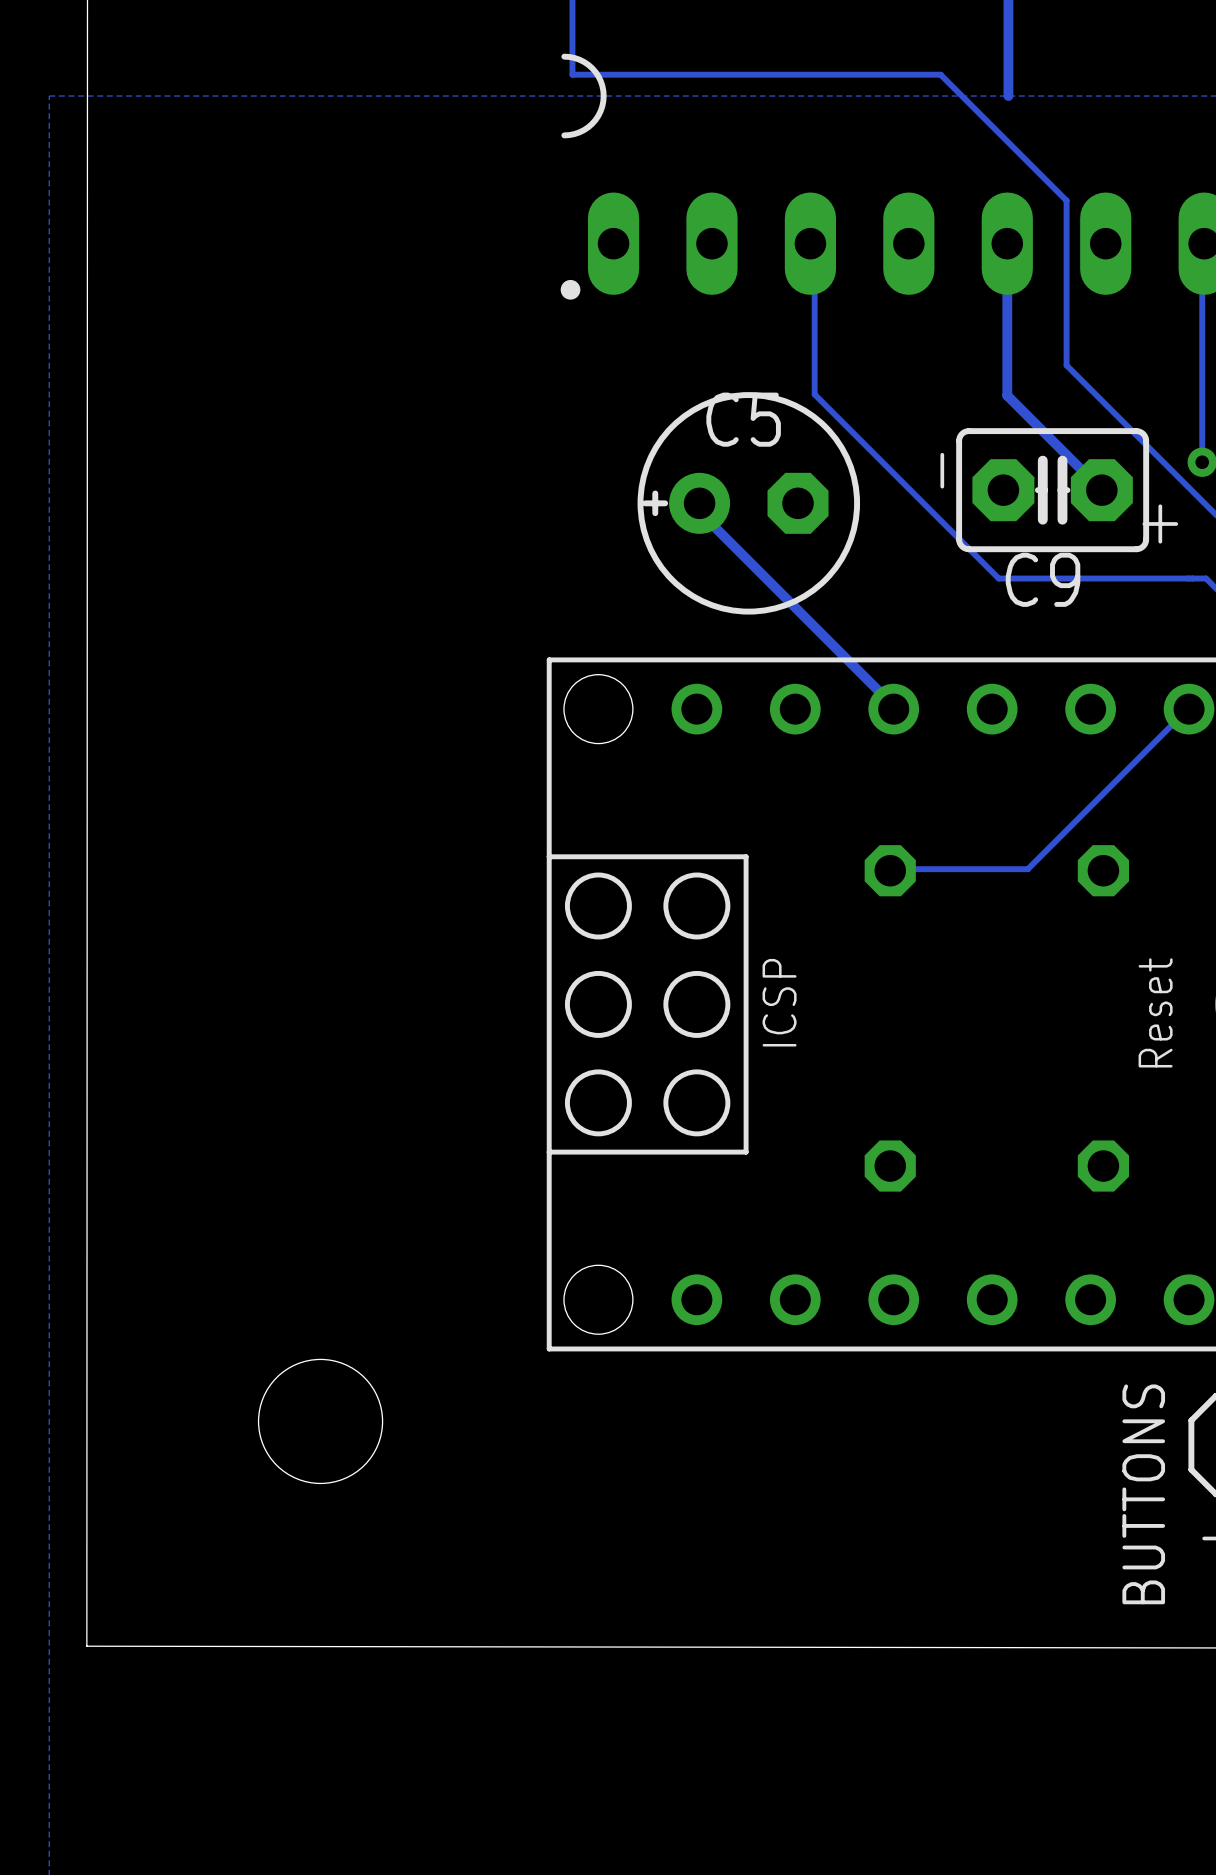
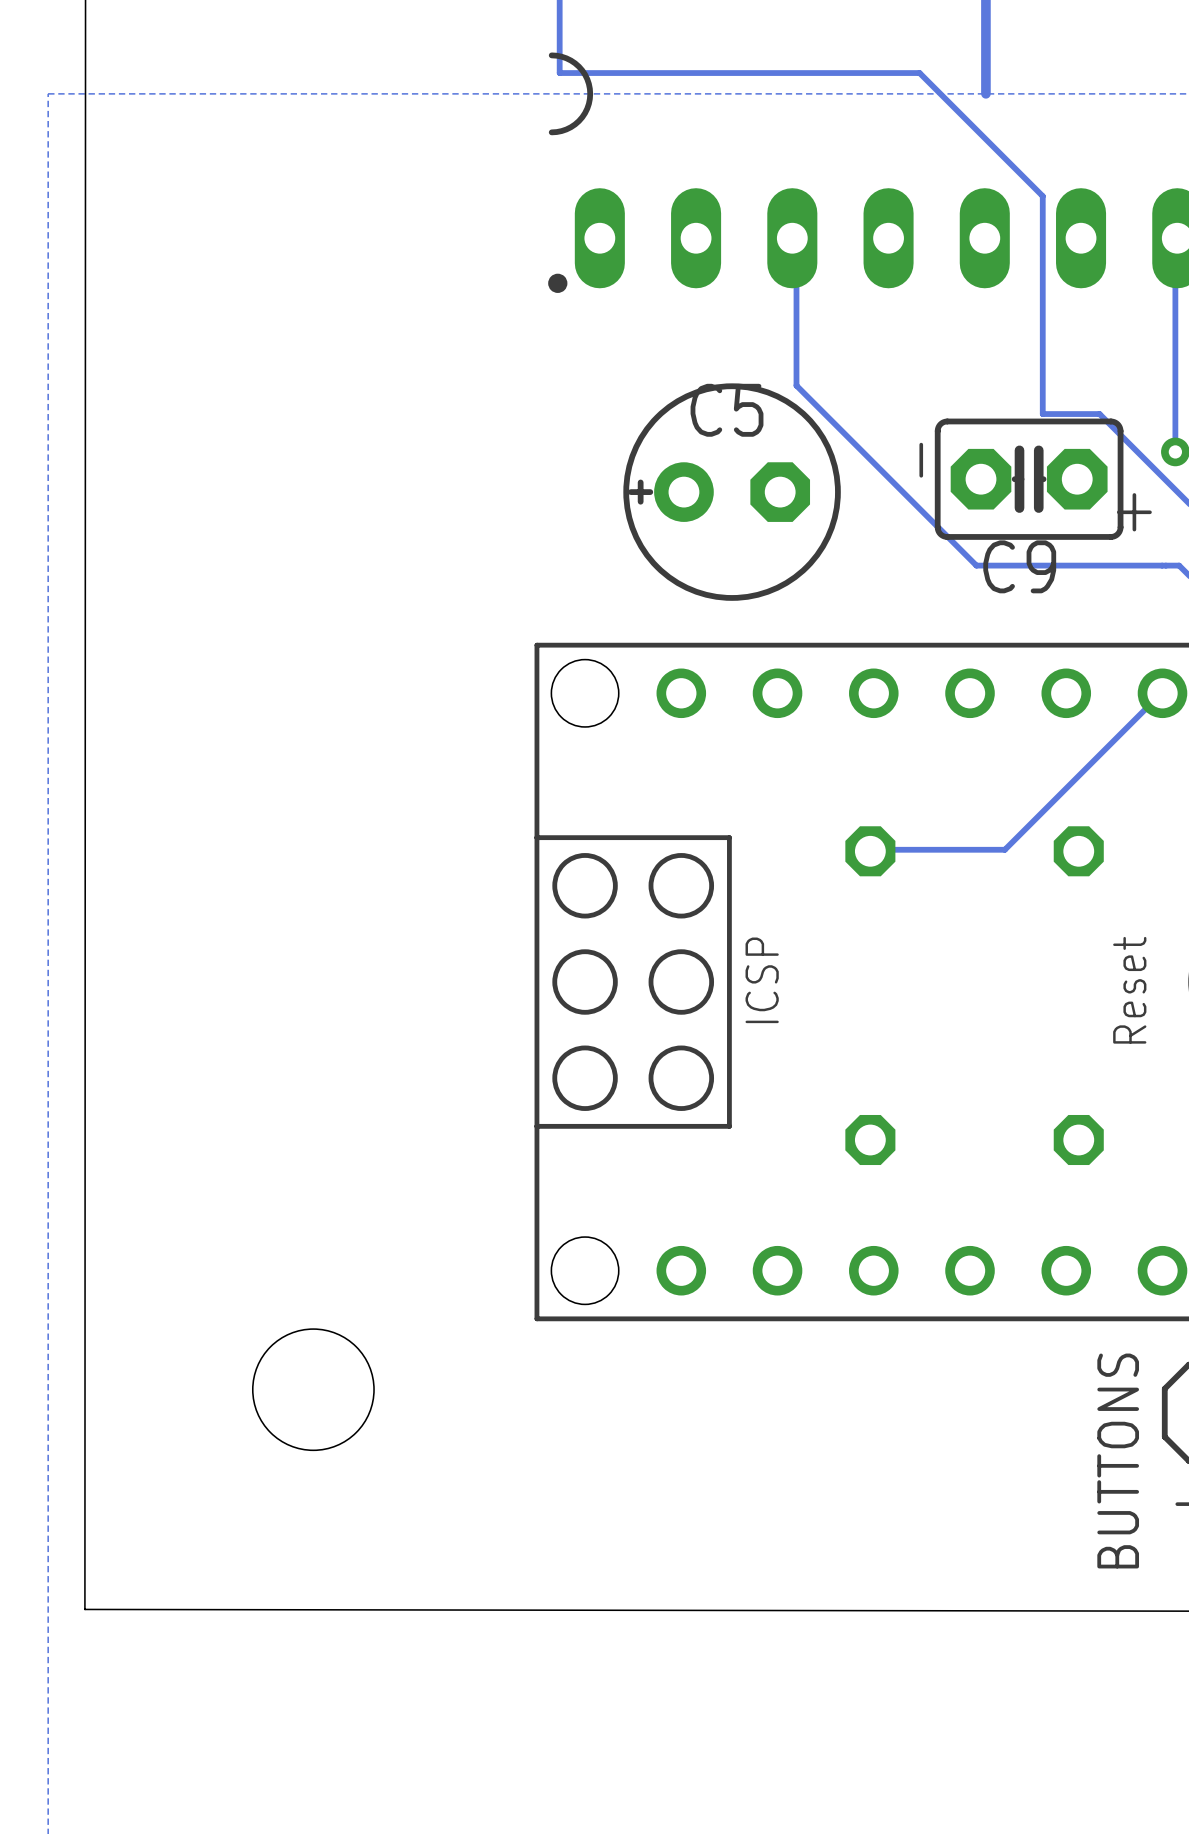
track: (1007, 243) (1007, 395) (1101, 490) -> none
track: (1066, 365) (1124, 423) -> (1042, 357) (1042, 414) (1099, 414)
track: (698, 510) (892, 704) -> none

